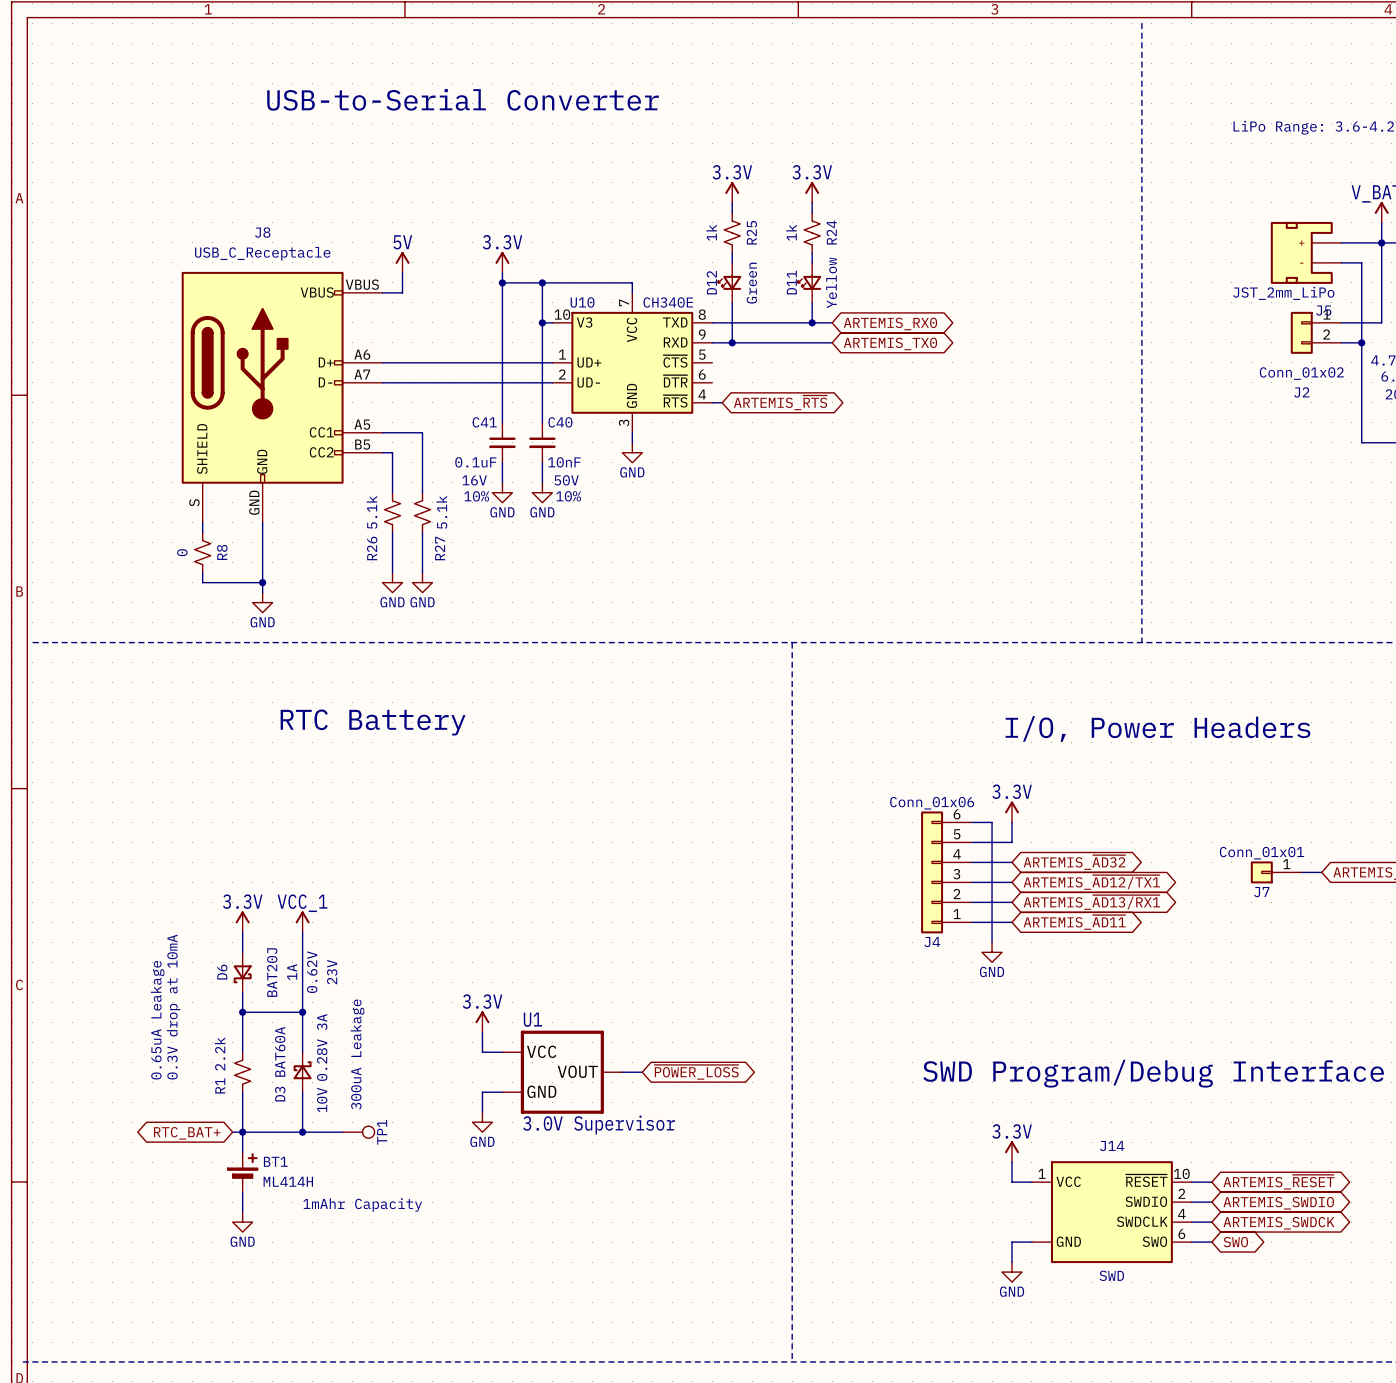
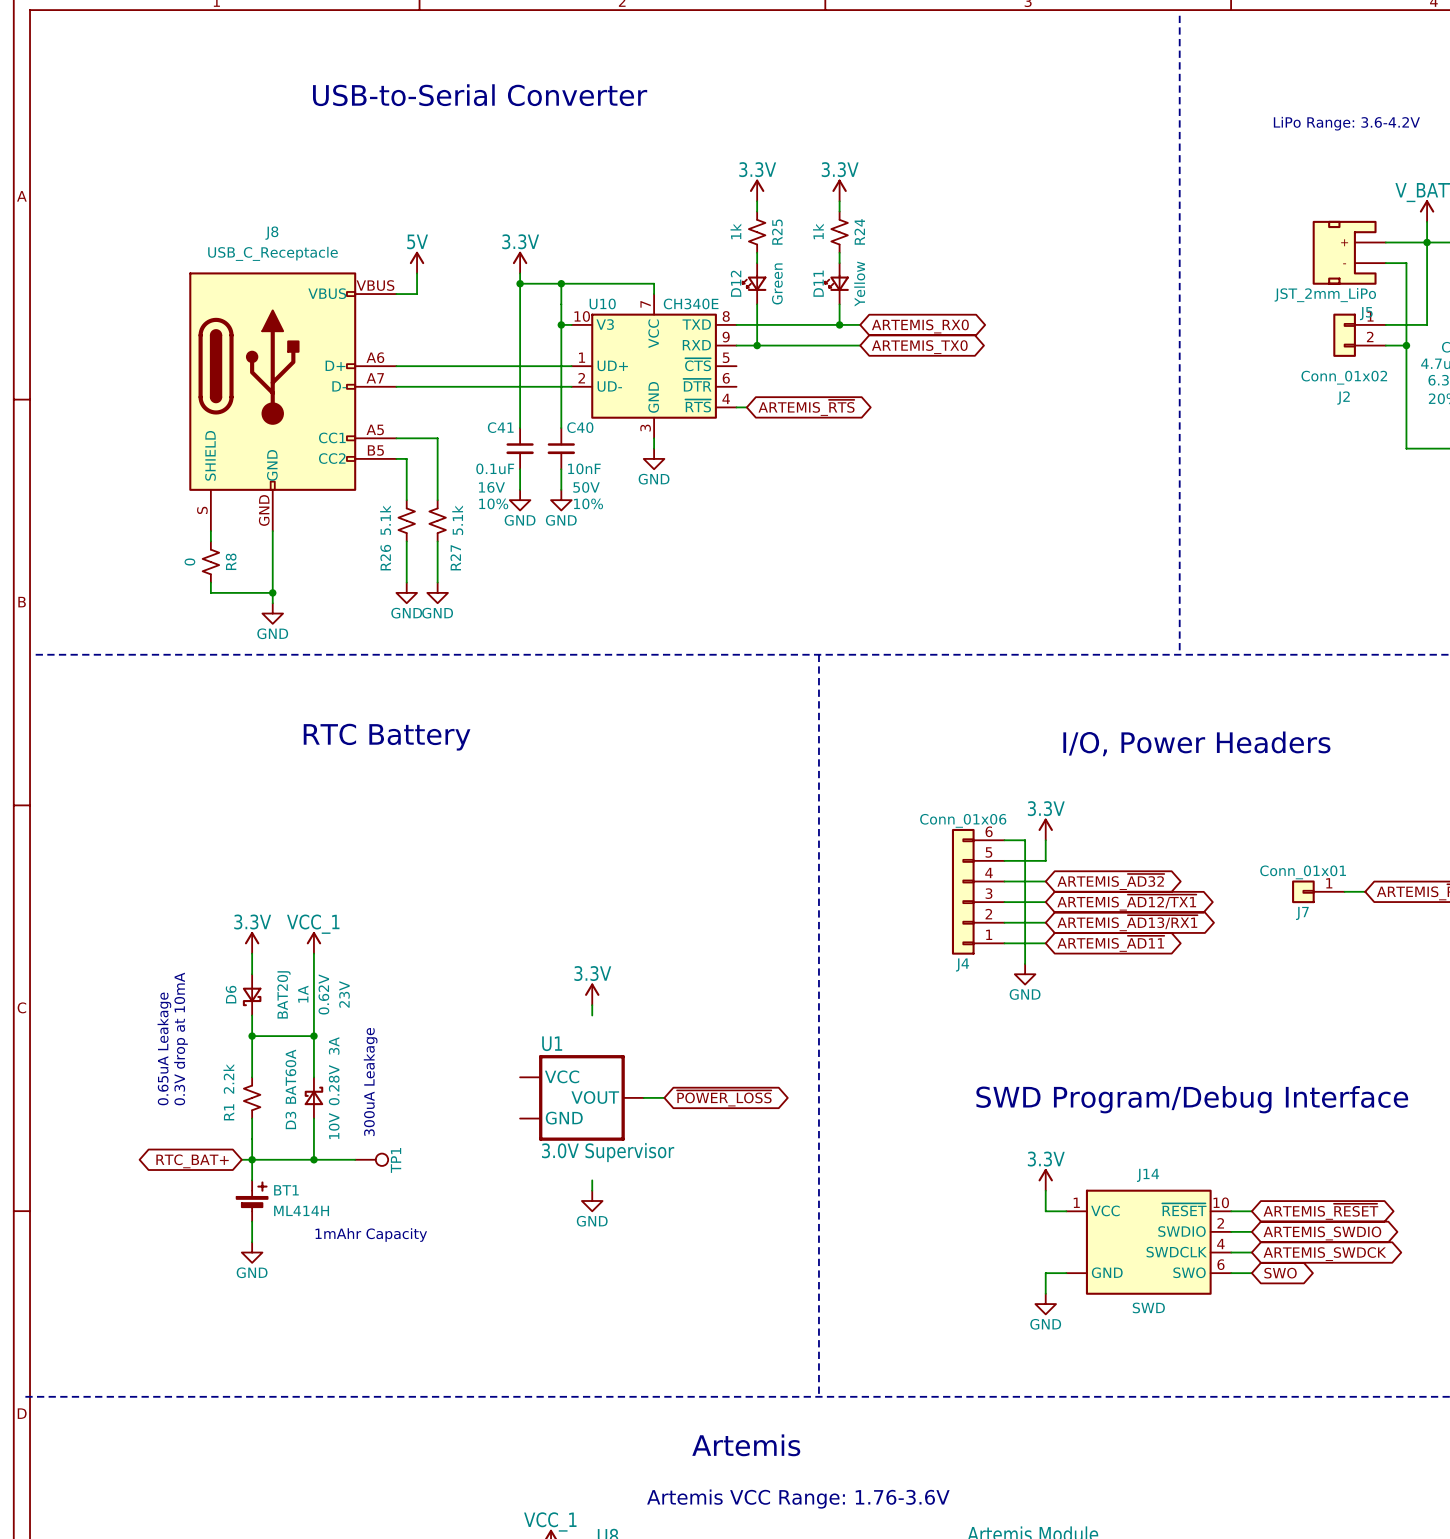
wire: none -> (592, 1005) (592, 1015)
power symbol position: 3.3V (482, 1021) -> 3.3V (592, 994)
wire: (482, 1032) (482, 1052) (502, 1052) -> none
wire: (502, 1092) (482, 1092) (482, 1112) -> none
power symbol position: GND (482, 1122) -> GND (592, 1201)
wire: none -> (592, 1180) (592, 1190)

